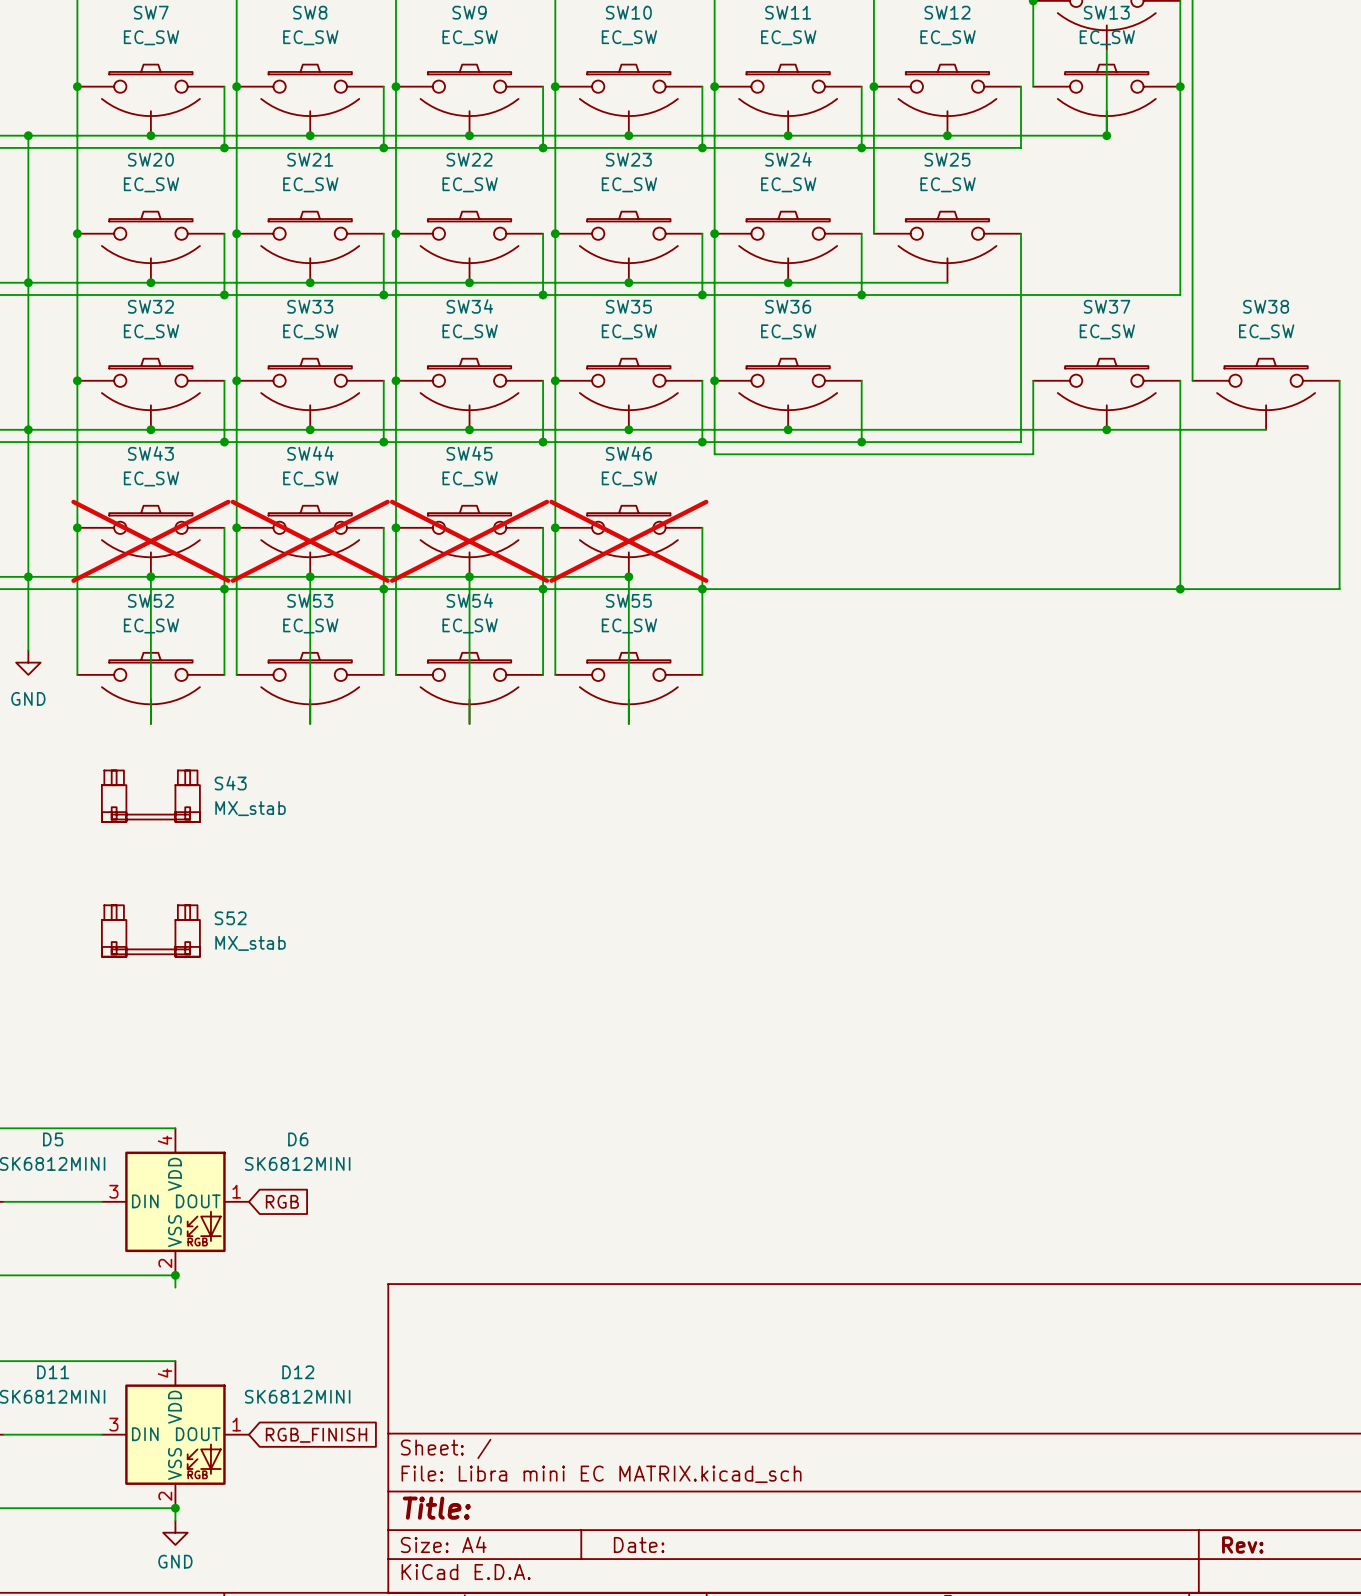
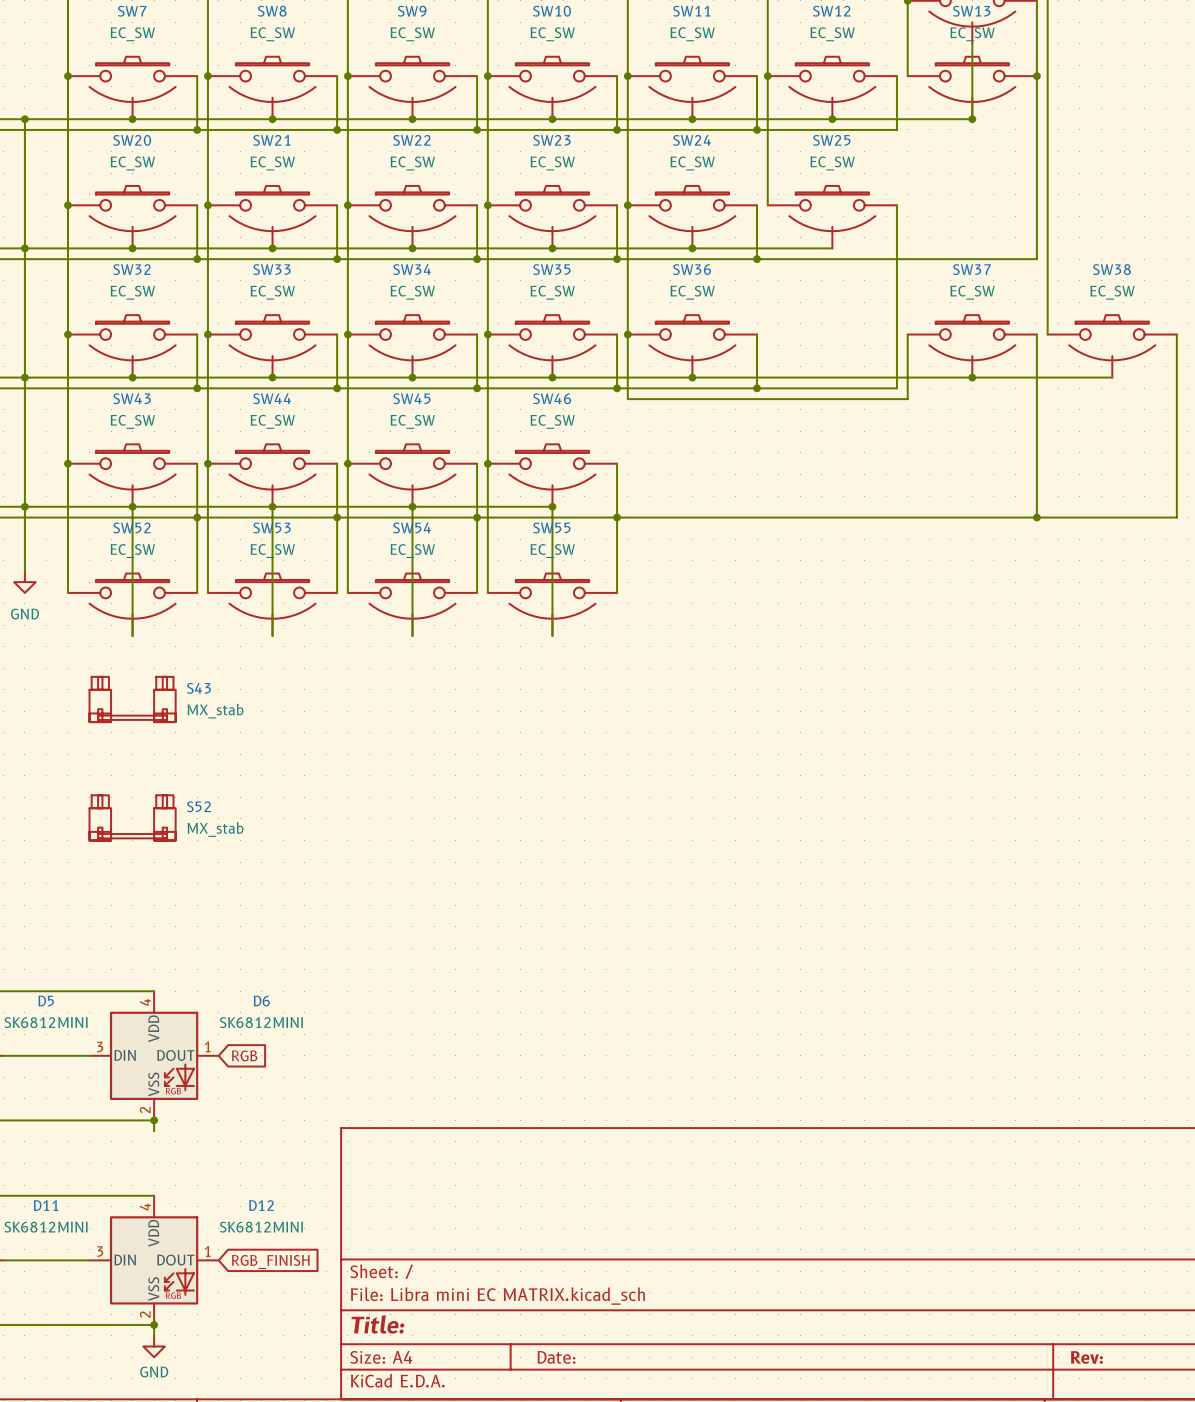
SW43 do-not-place cross: (150, 541) -> none
SW44 do-not-place cross: (310, 541) -> none
SW45 do-not-place cross: (469, 541) -> none
SW46 do-not-place cross: (628, 541) -> none

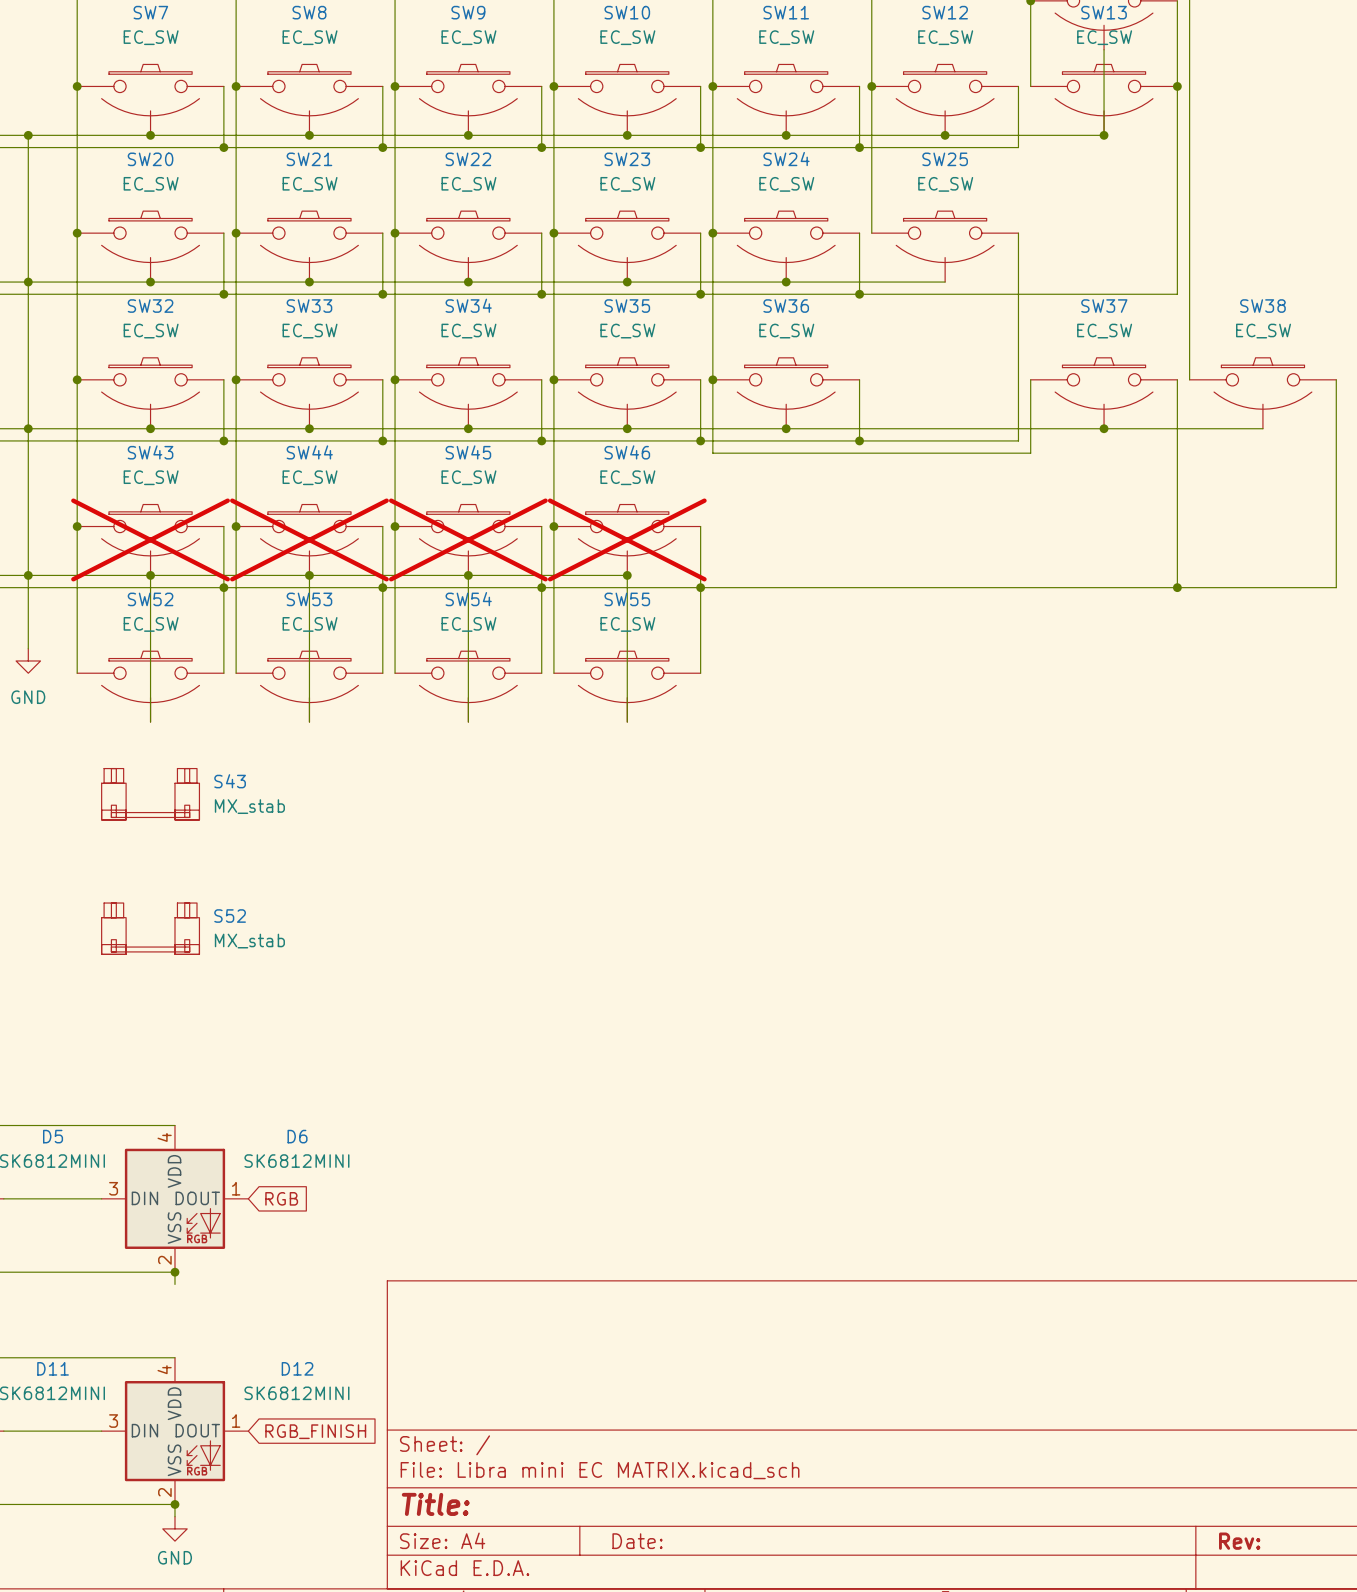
SW43 do-not-place cross: none -> (150, 539)
SW44 do-not-place cross: none -> (309, 539)
SW45 do-not-place cross: none -> (468, 539)
SW46 do-not-place cross: none -> (627, 539)

